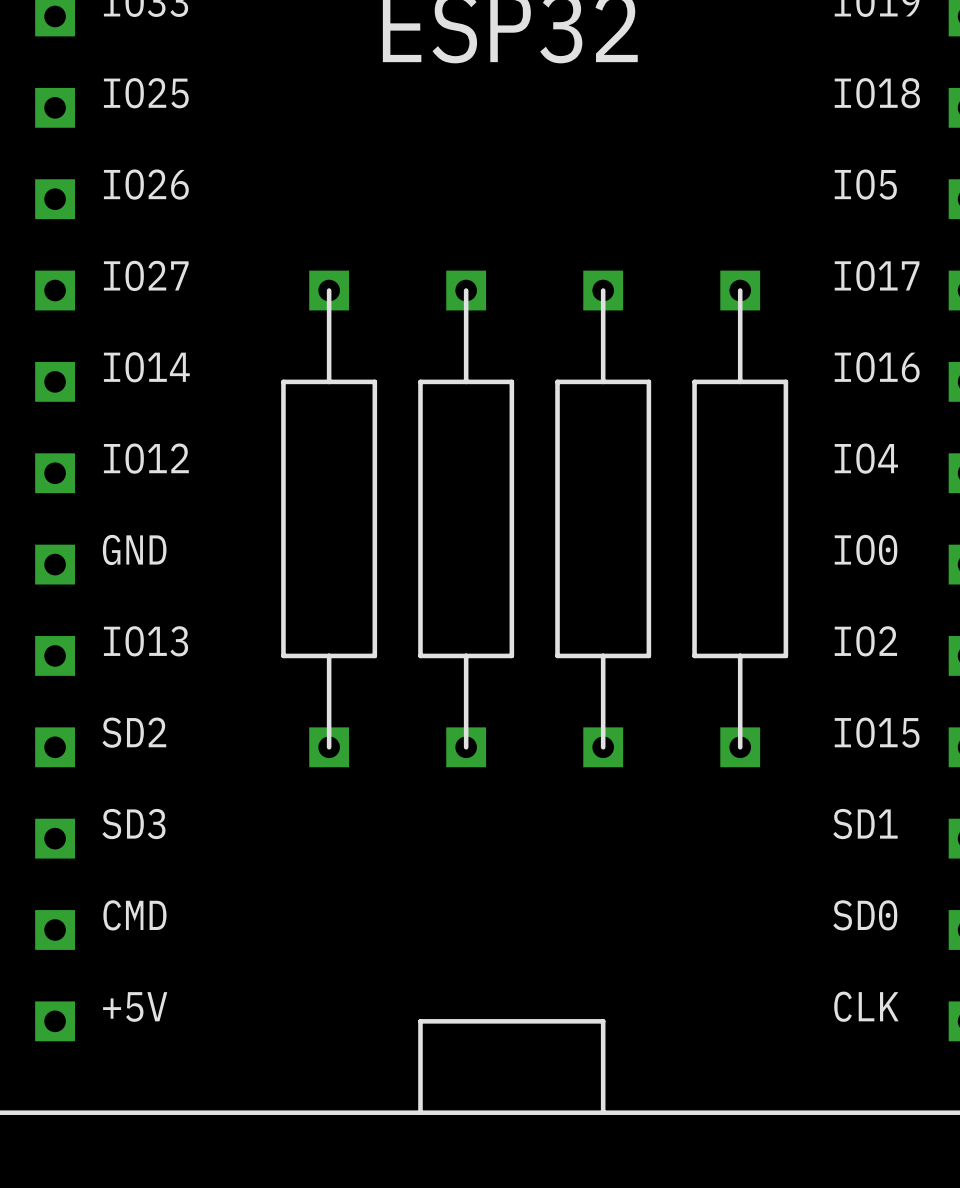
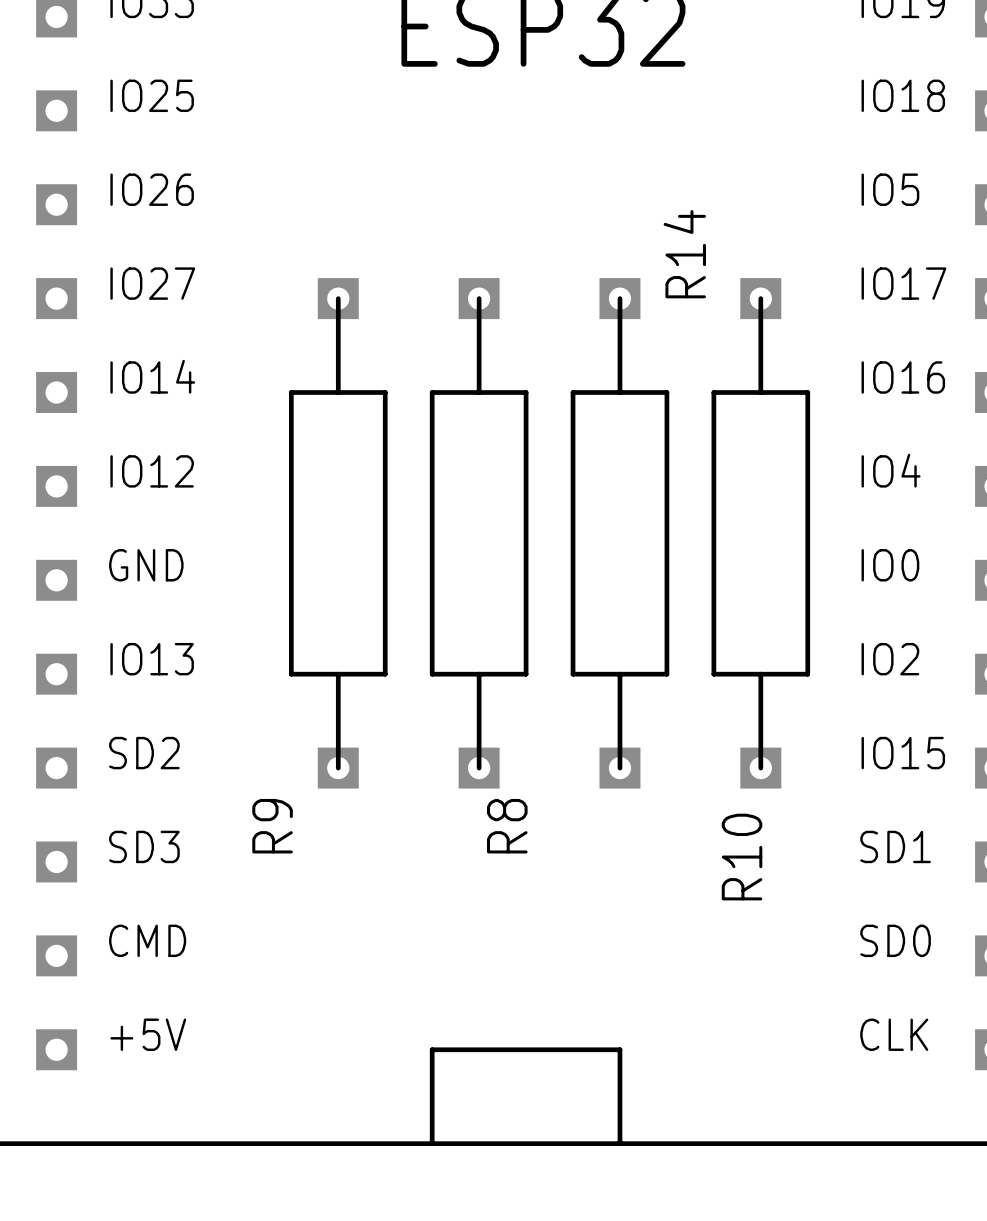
text: none -> R14 (684, 254)
text: none -> R9 (272, 826)
text: none -> R8 (507, 826)
text: none -> R10 (742, 857)

